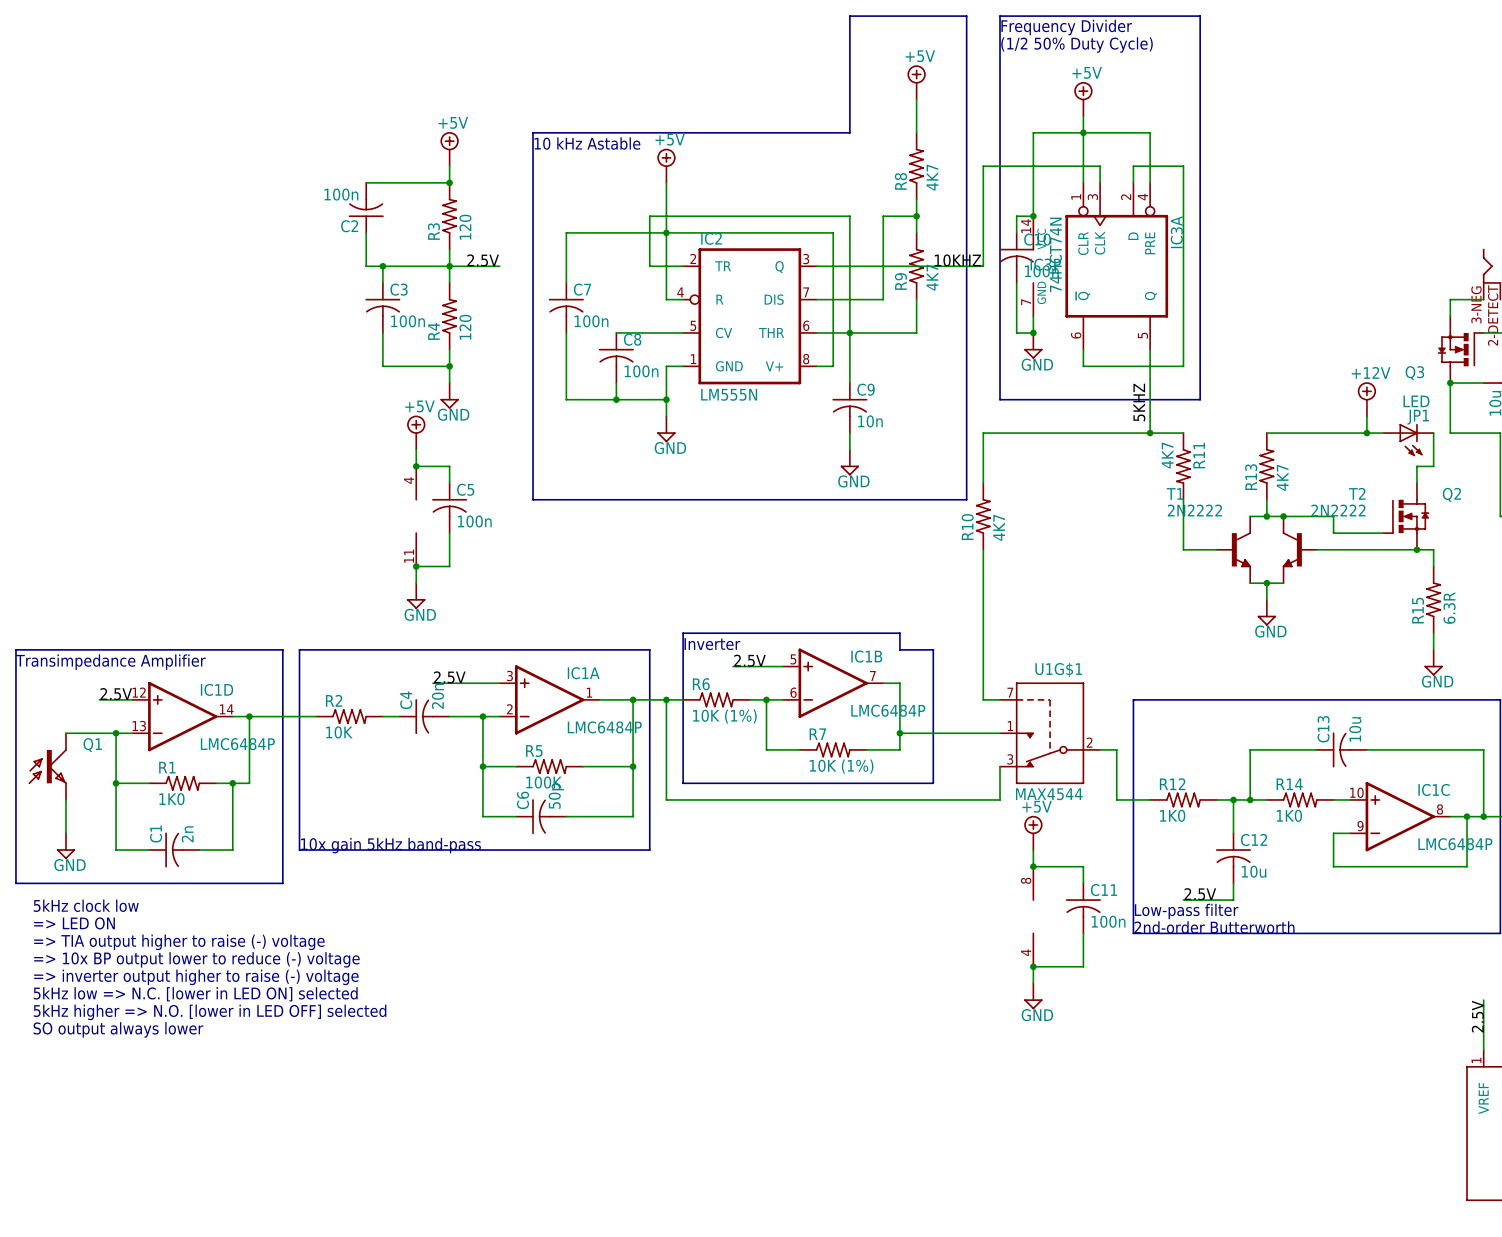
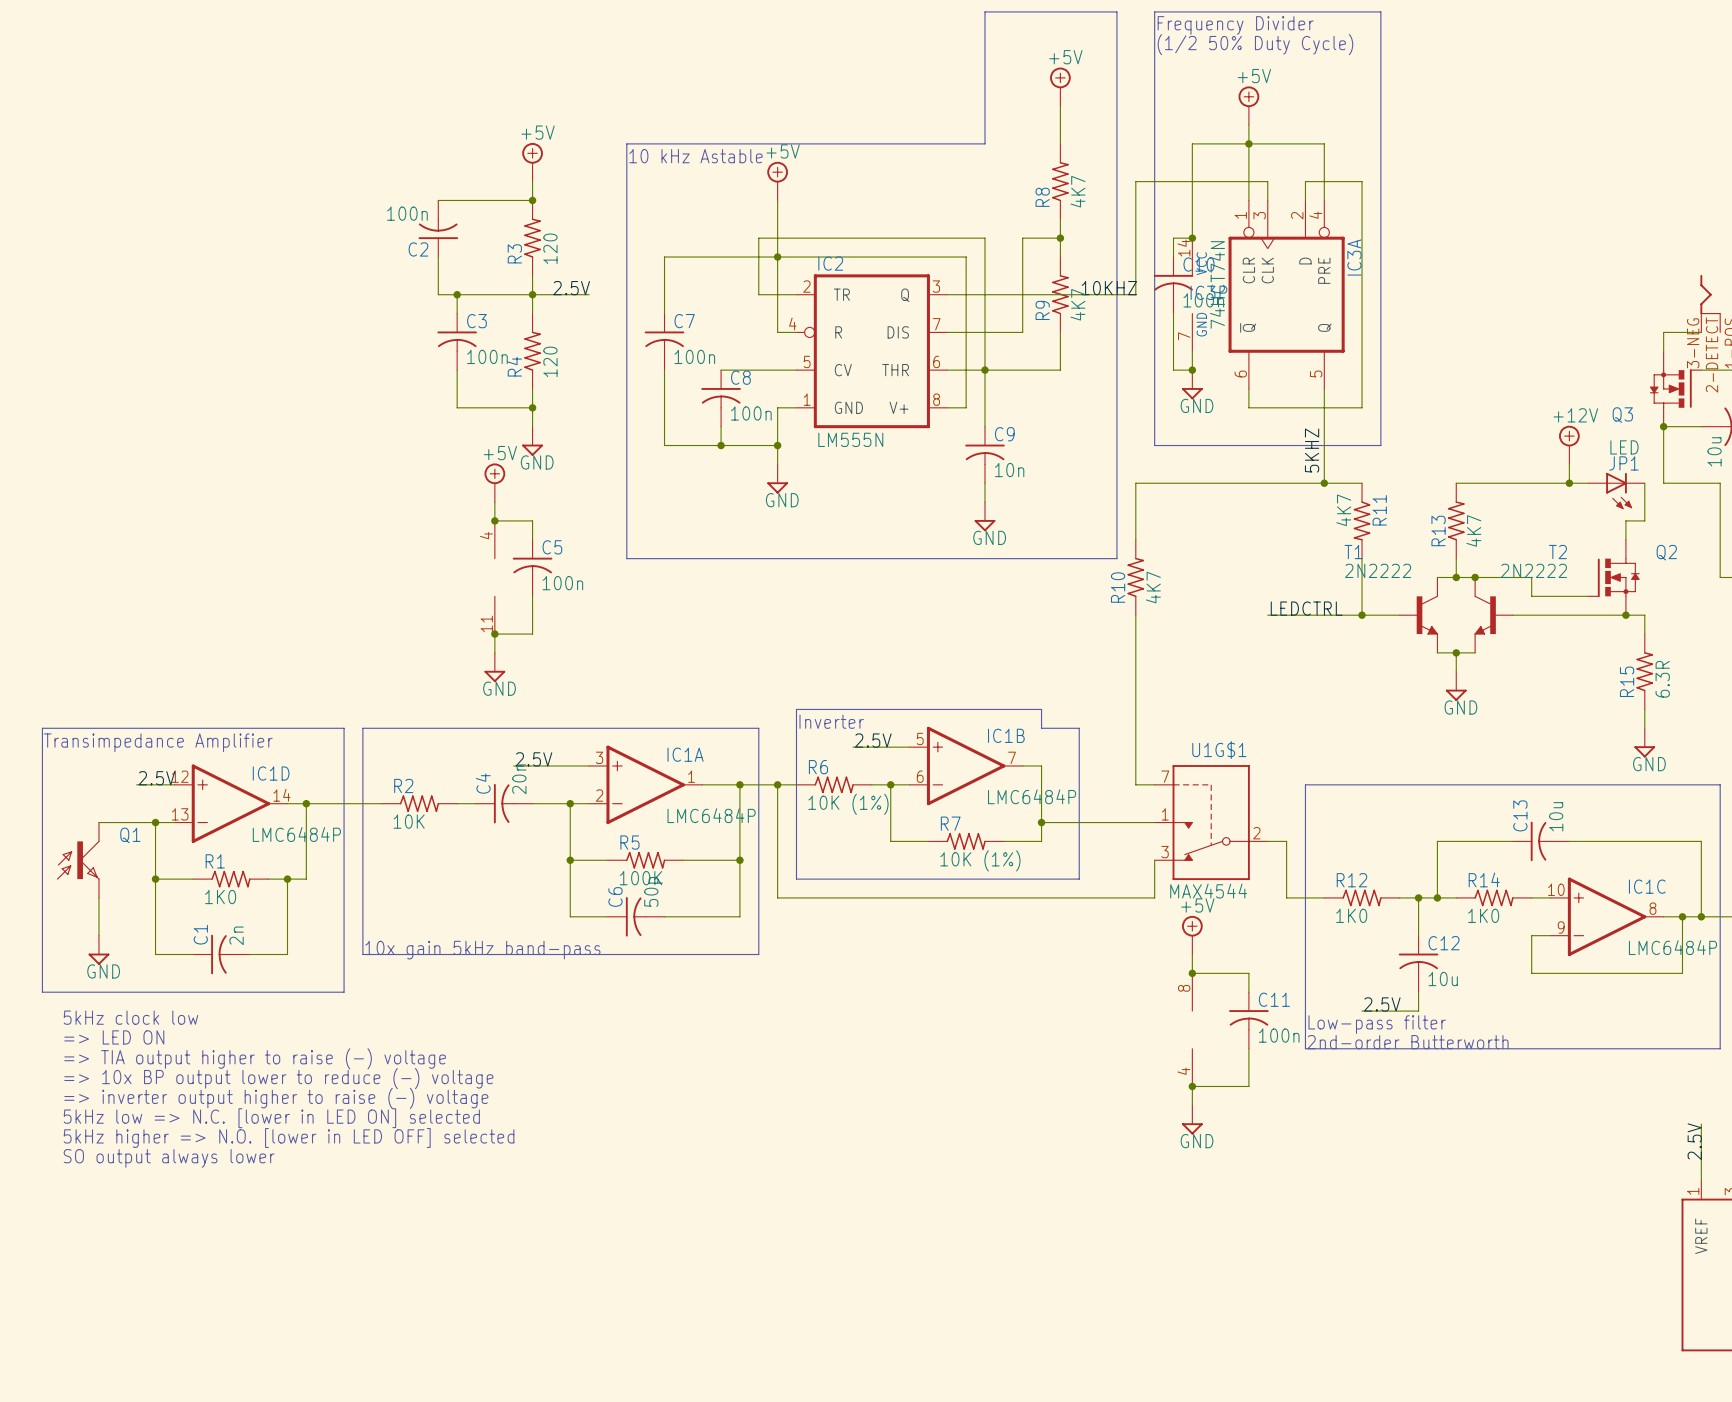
label: none -> LEDCTRL (1306, 608)
wire: none -> (1267, 615) (1362, 615)
junction: none -> (1362, 615)

